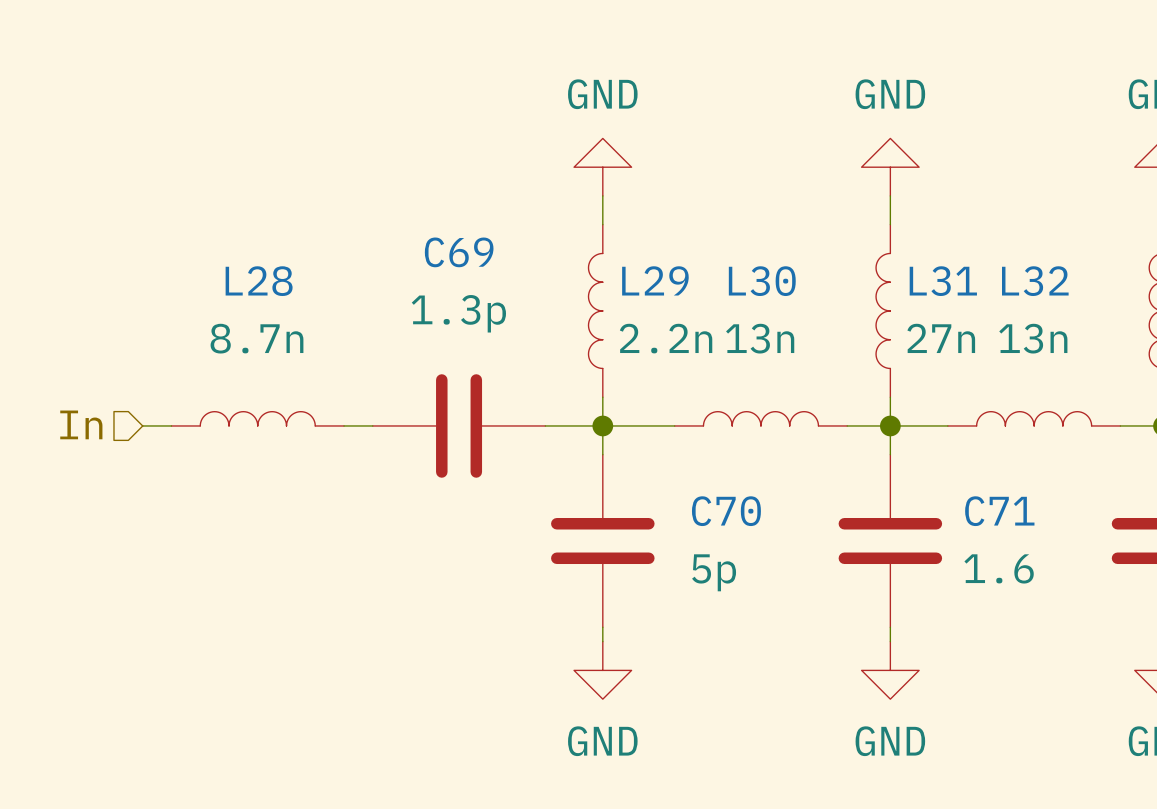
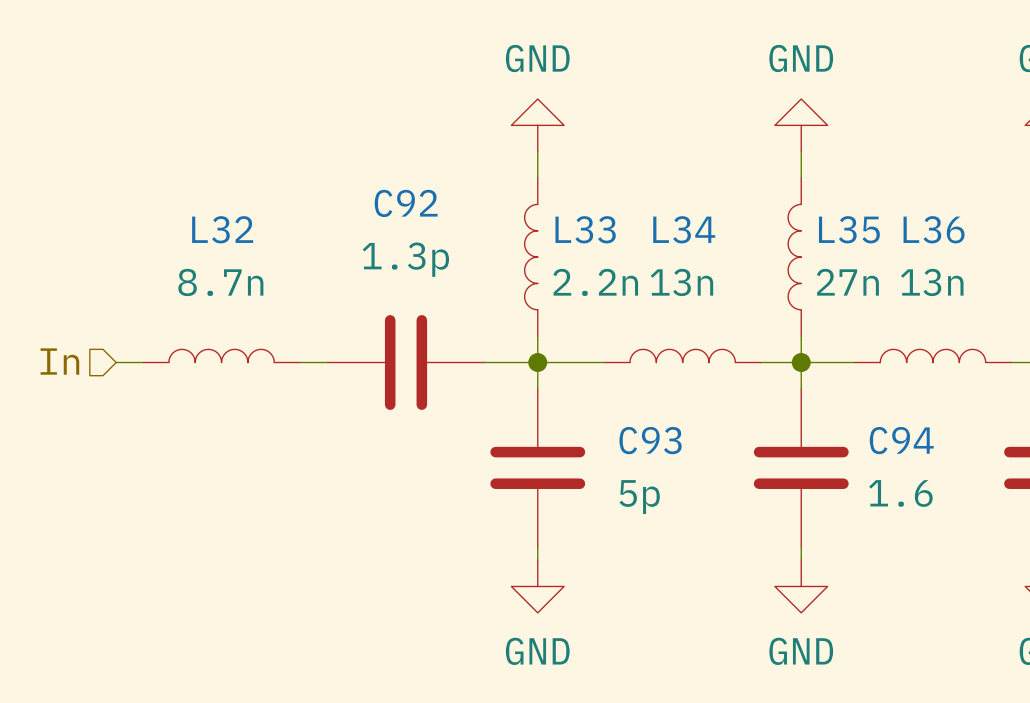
C69 name: C69 (459, 252) -> C92 (406, 203)
L29 name: L29 (655, 280) -> L33 (585, 229)
L28 name: L28 (259, 281) -> L32 (222, 229)
L30 name: L30 (762, 281) -> L34 (684, 229)
L31 name: L31 (943, 281) -> L35 (849, 229)
L32 name: L32 (1035, 281) -> L36 (934, 229)
C70 name: C70 (726, 511) -> C93 (650, 440)
C71 name: C71 (999, 511) -> C94 (901, 440)

